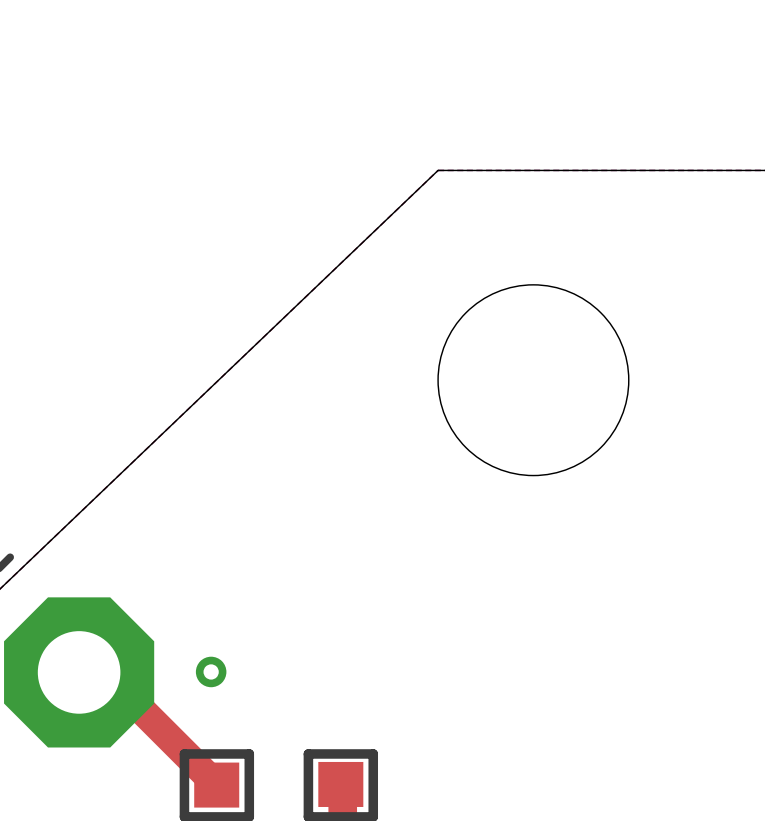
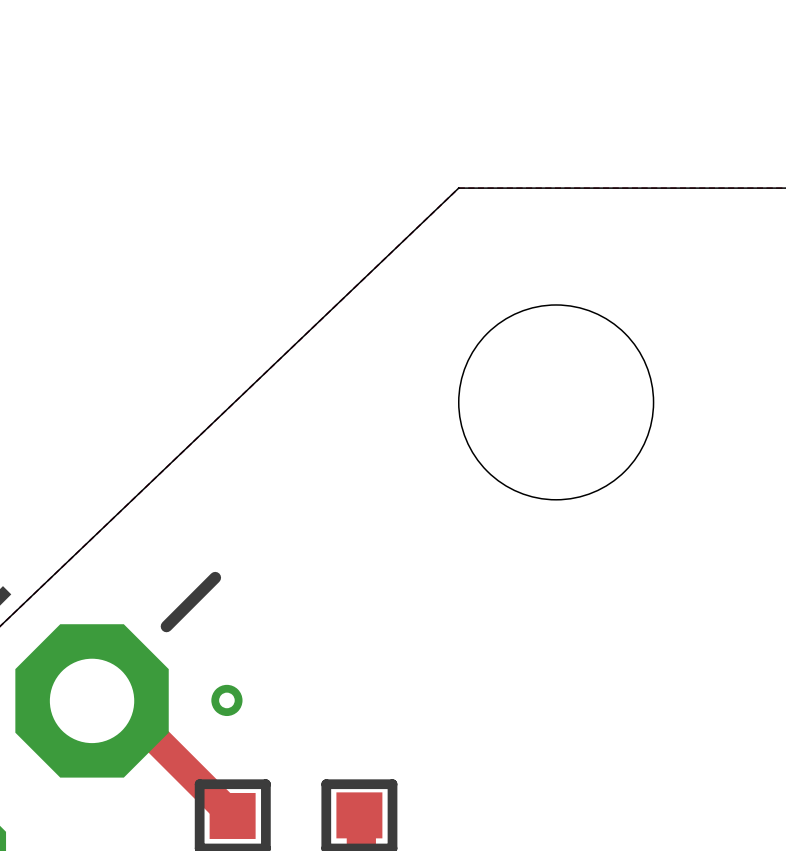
line: none -> (215, 577) (166, 626)

